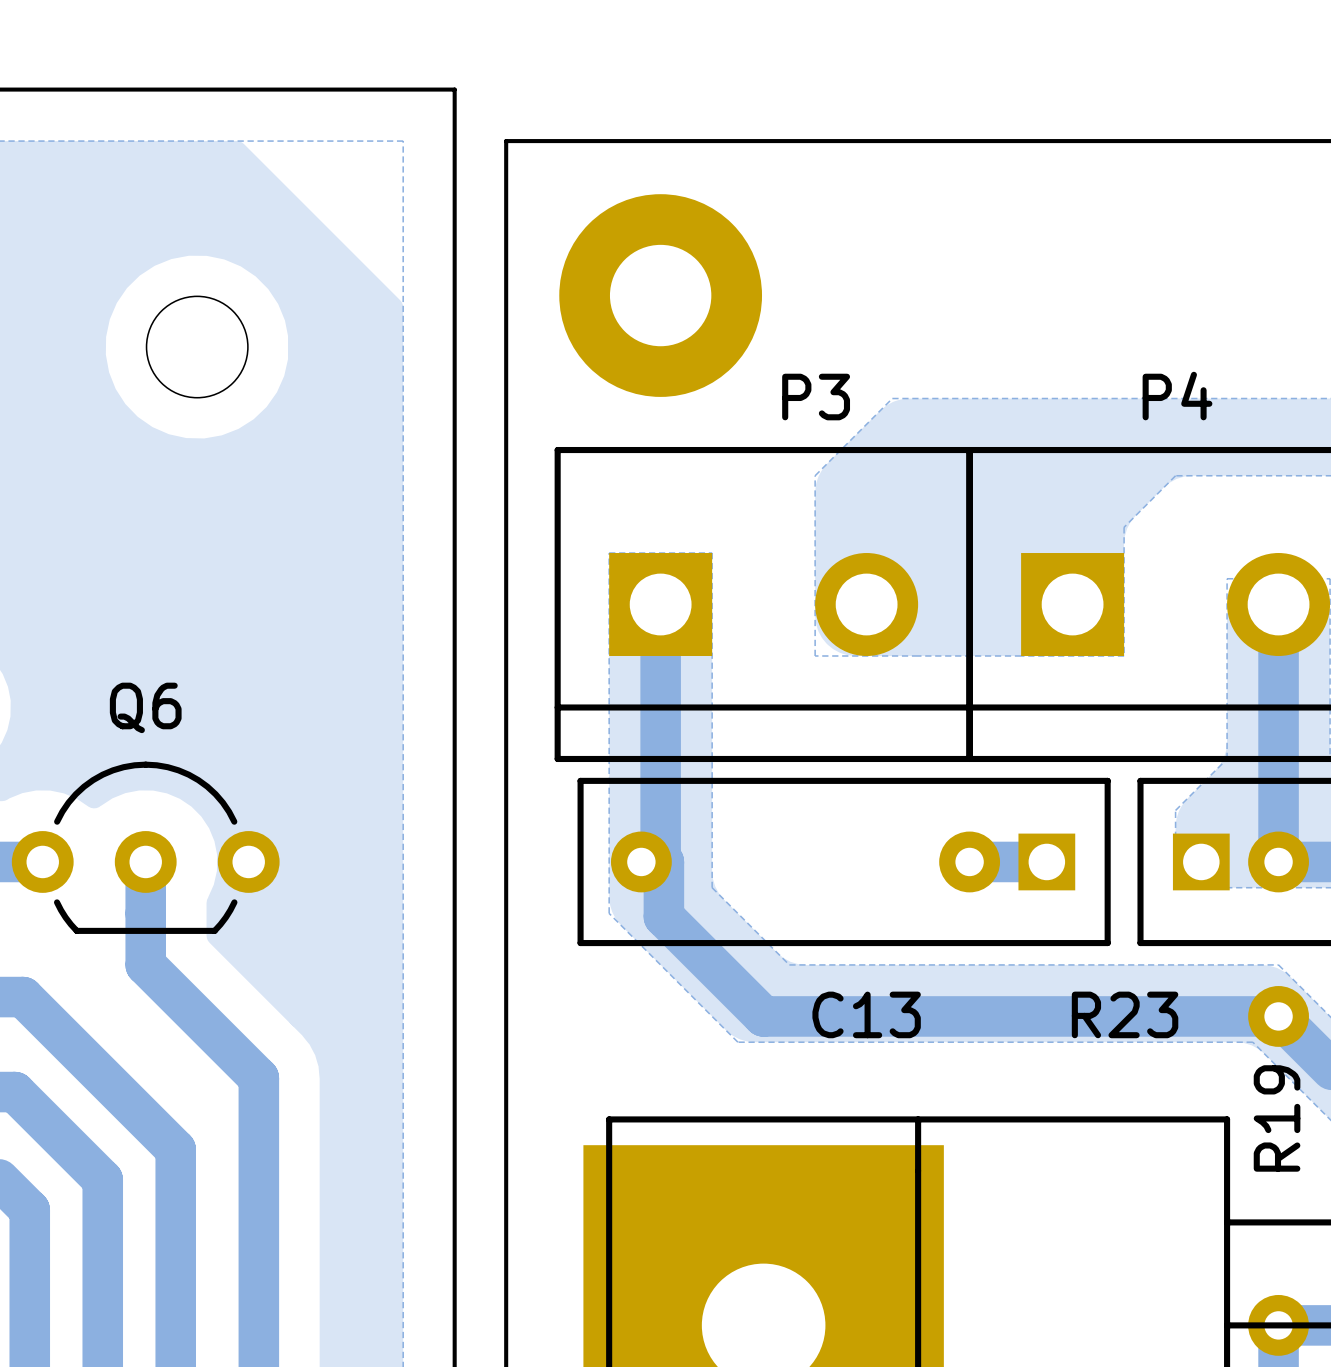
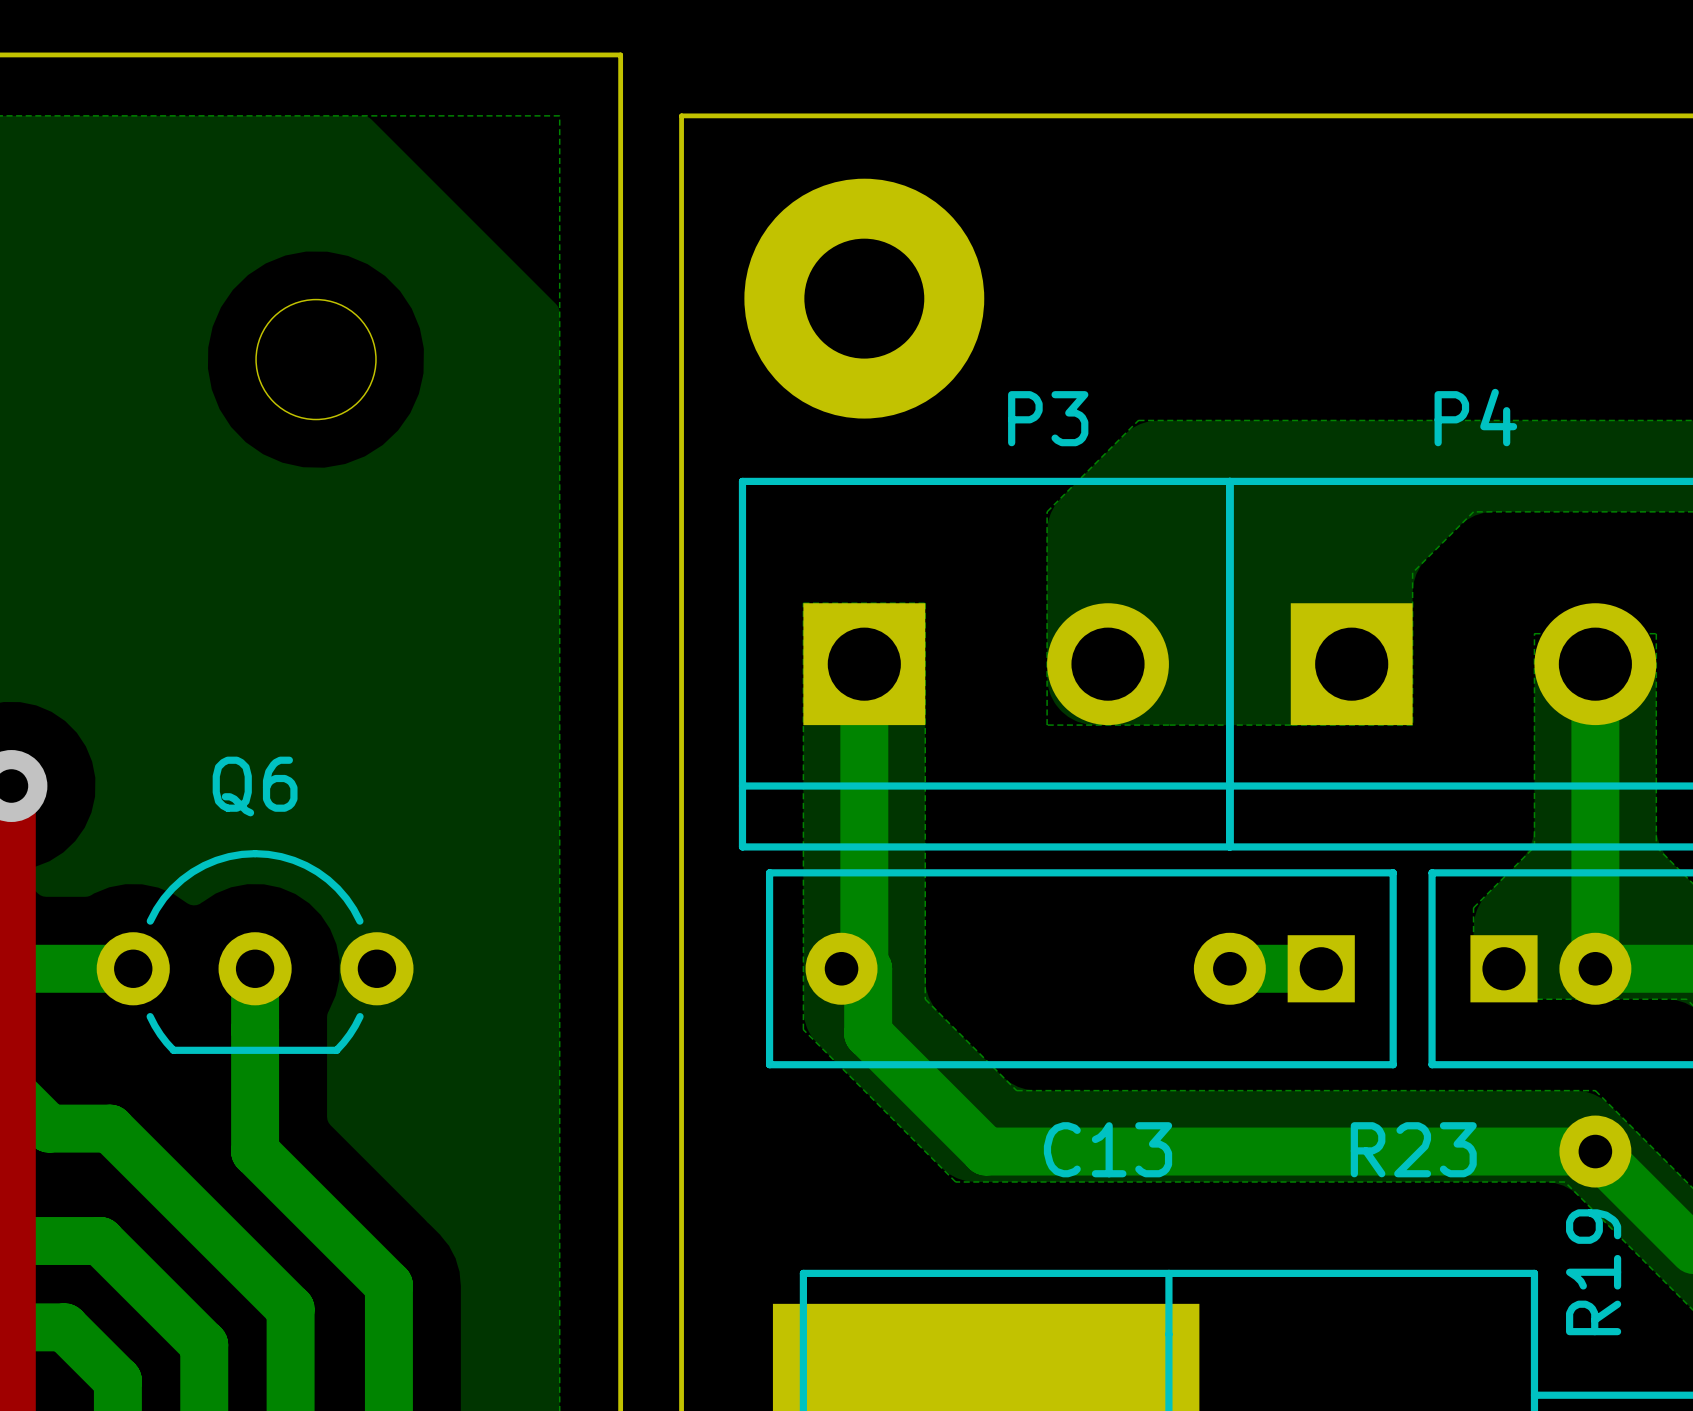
bottom track: (145, 964) (258, 1078) (258, 1129) -> (255, 1090) (255, 1151) (388, 1285)

